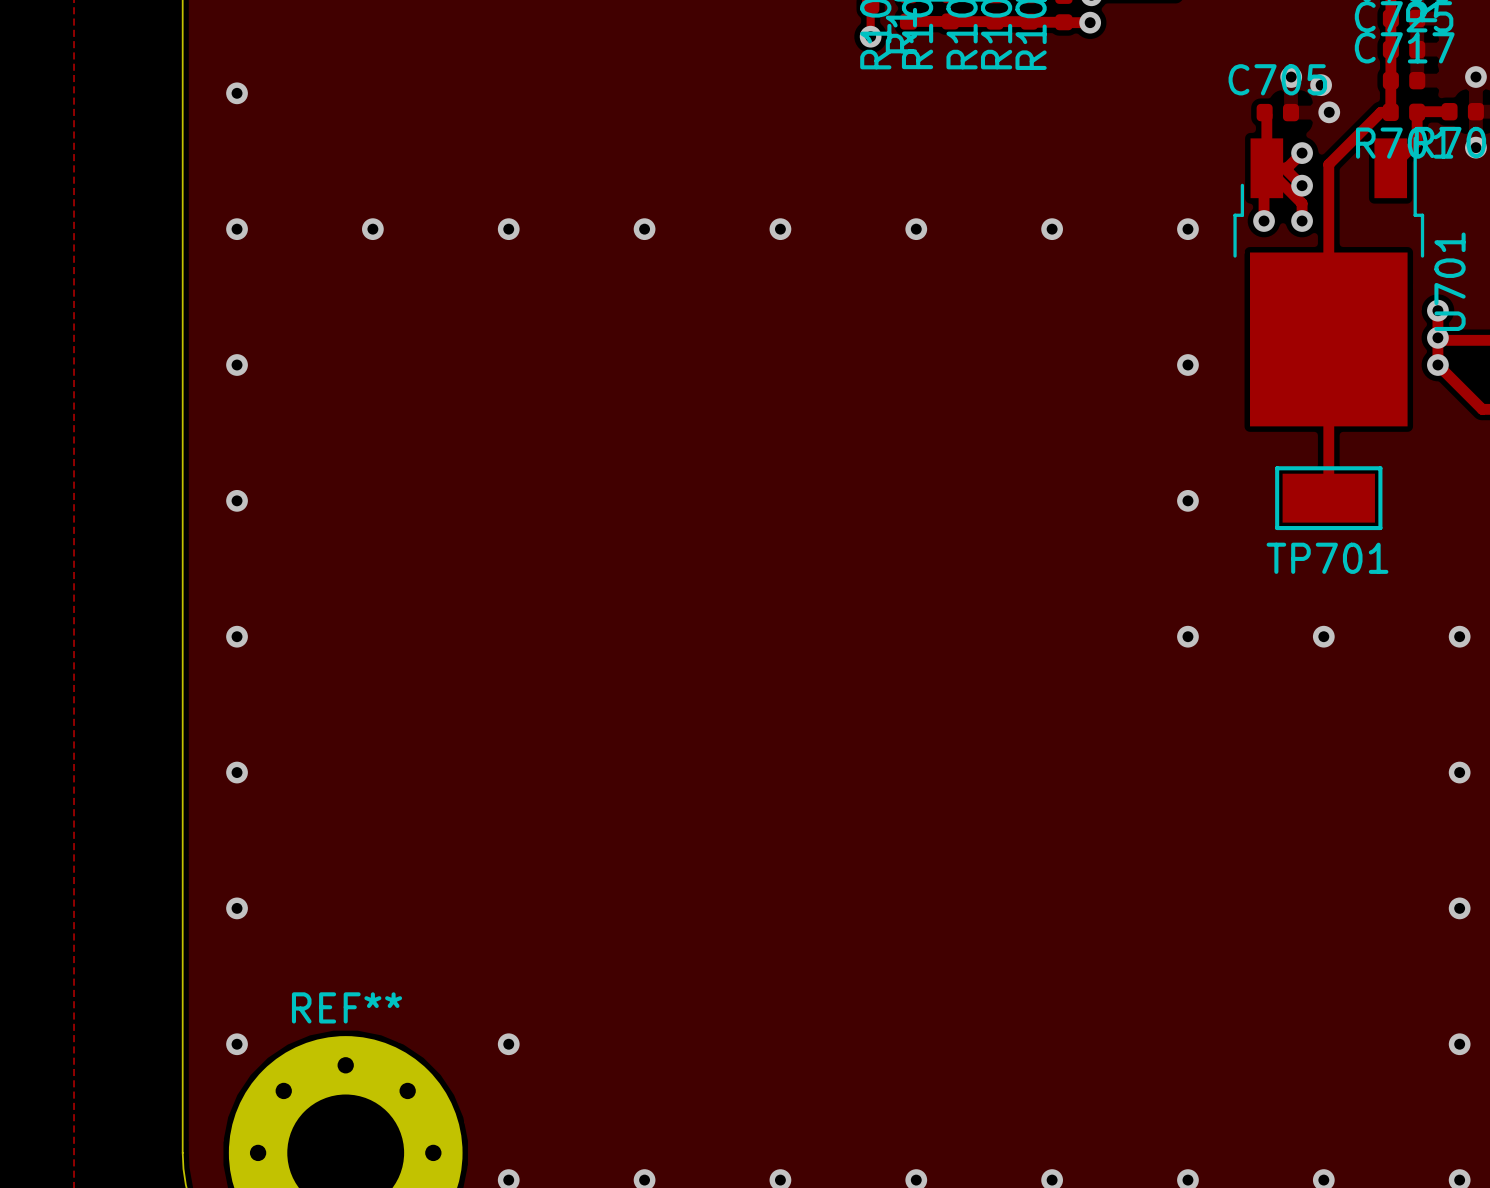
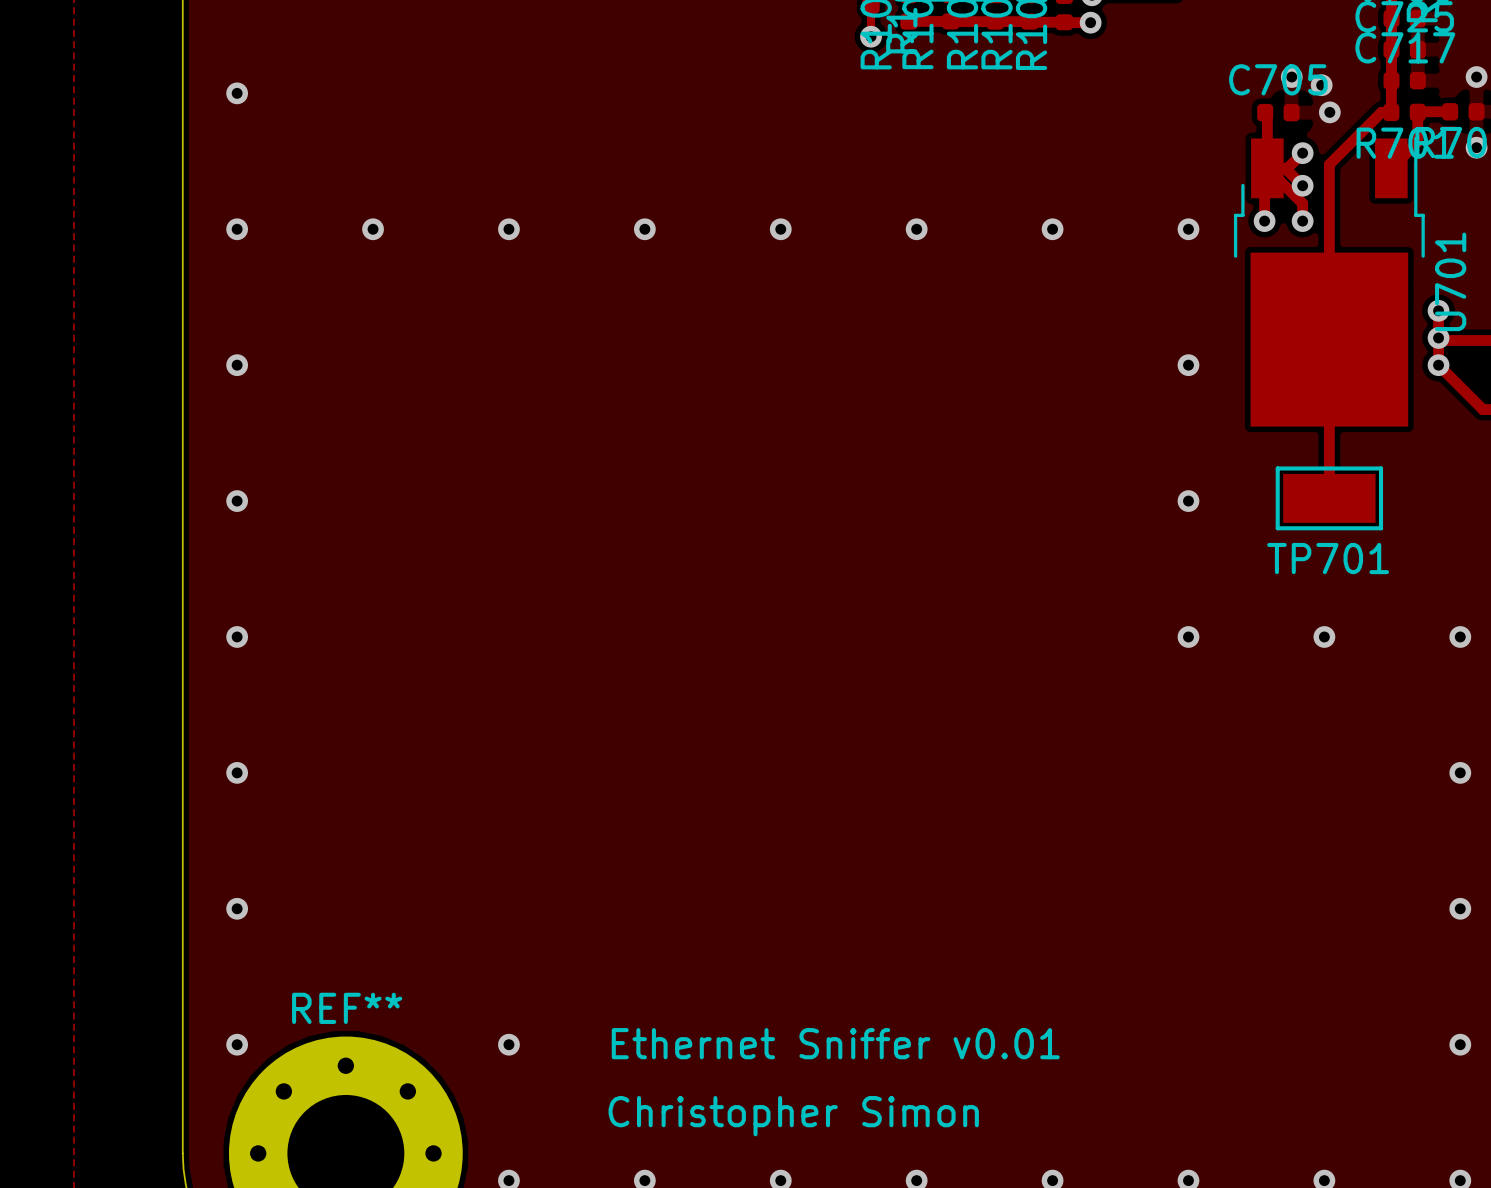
text: none -> Ethernet Sniffer v0.01 (835, 1043)
text: none -> Christopher Simon (793, 1116)

